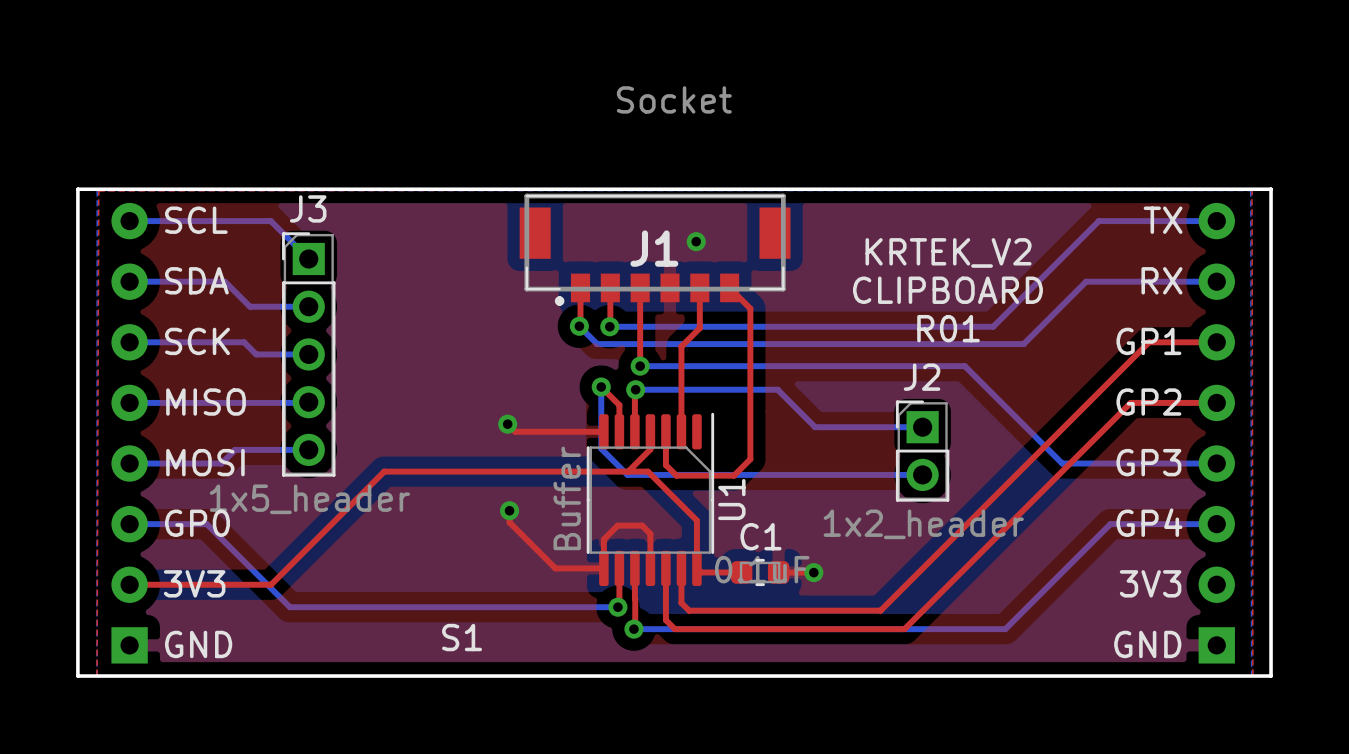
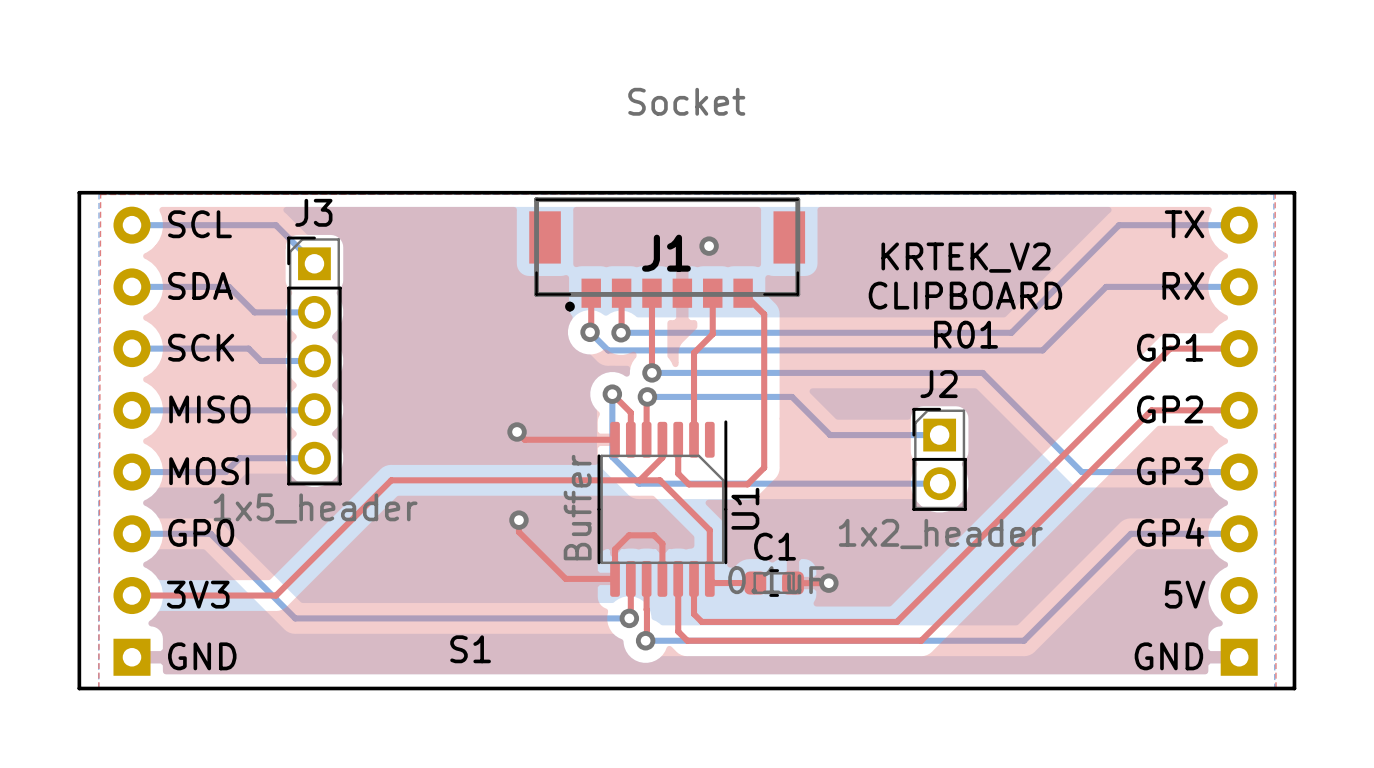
S1 text: 3V3 (1150, 583) -> 5V (1185, 594)

